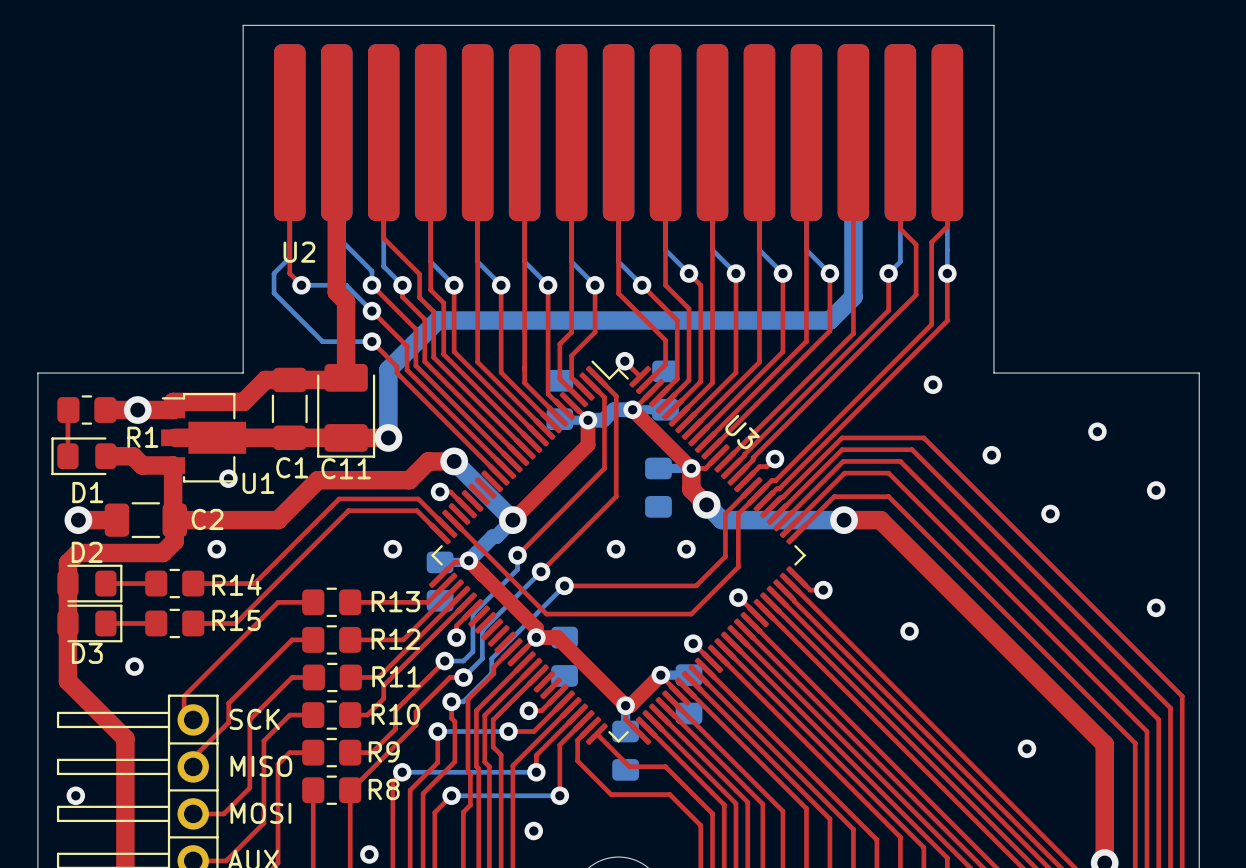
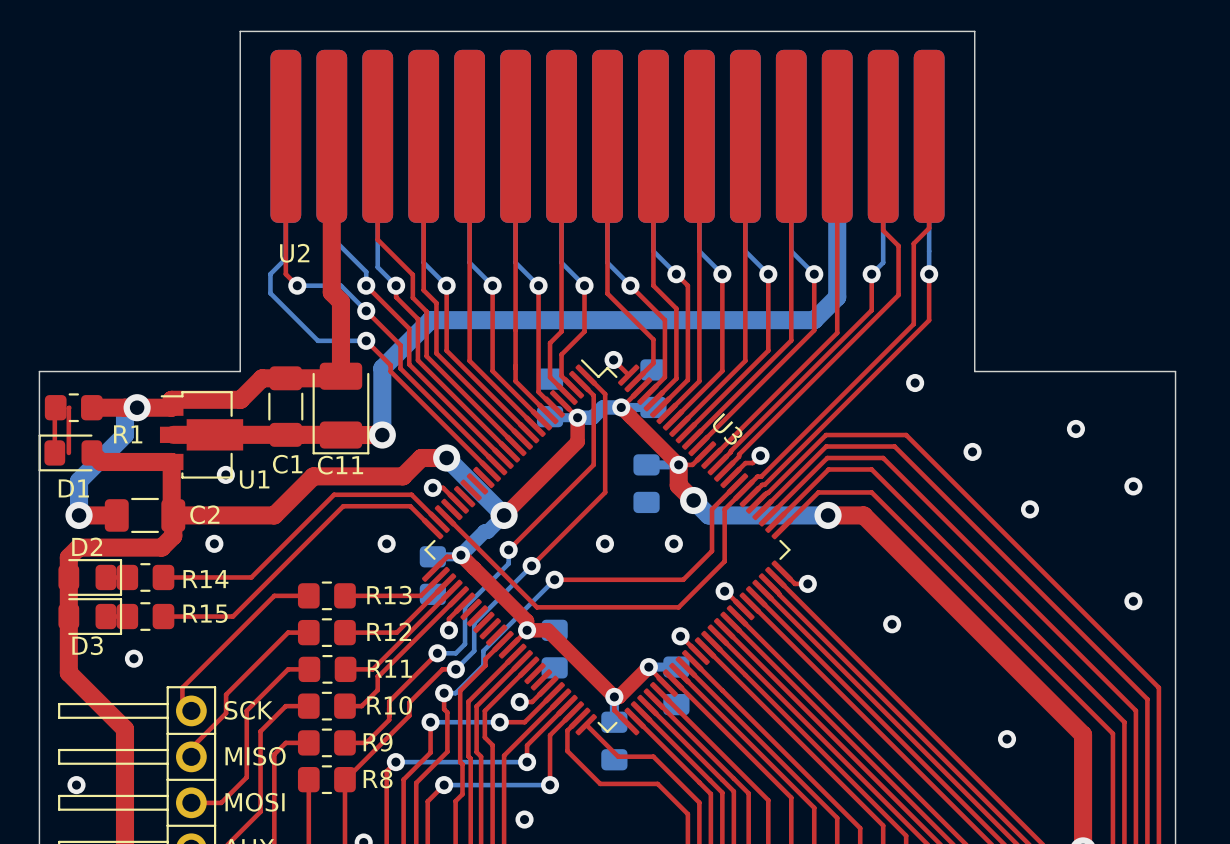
top track: none -> (55, 407) (54, 452)
R1 position: (86, 410) -> (73, 407)
bottom track: none -> (125, 407) (125, 435) (79, 480) (79, 515)
D1 position: (83, 456) -> (70, 452)
top track: (105, 456) (133, 456) (142, 465) -> (91, 452) (100, 461) (141, 461)
top track: (127, 583) (156, 583) -> (163, 577) (191, 577)
R14 position: (174, 583) -> (145, 577)
top track: (127, 623) (156, 623) -> (163, 616) (191, 616)
R15 position: (174, 623) -> (145, 616)

